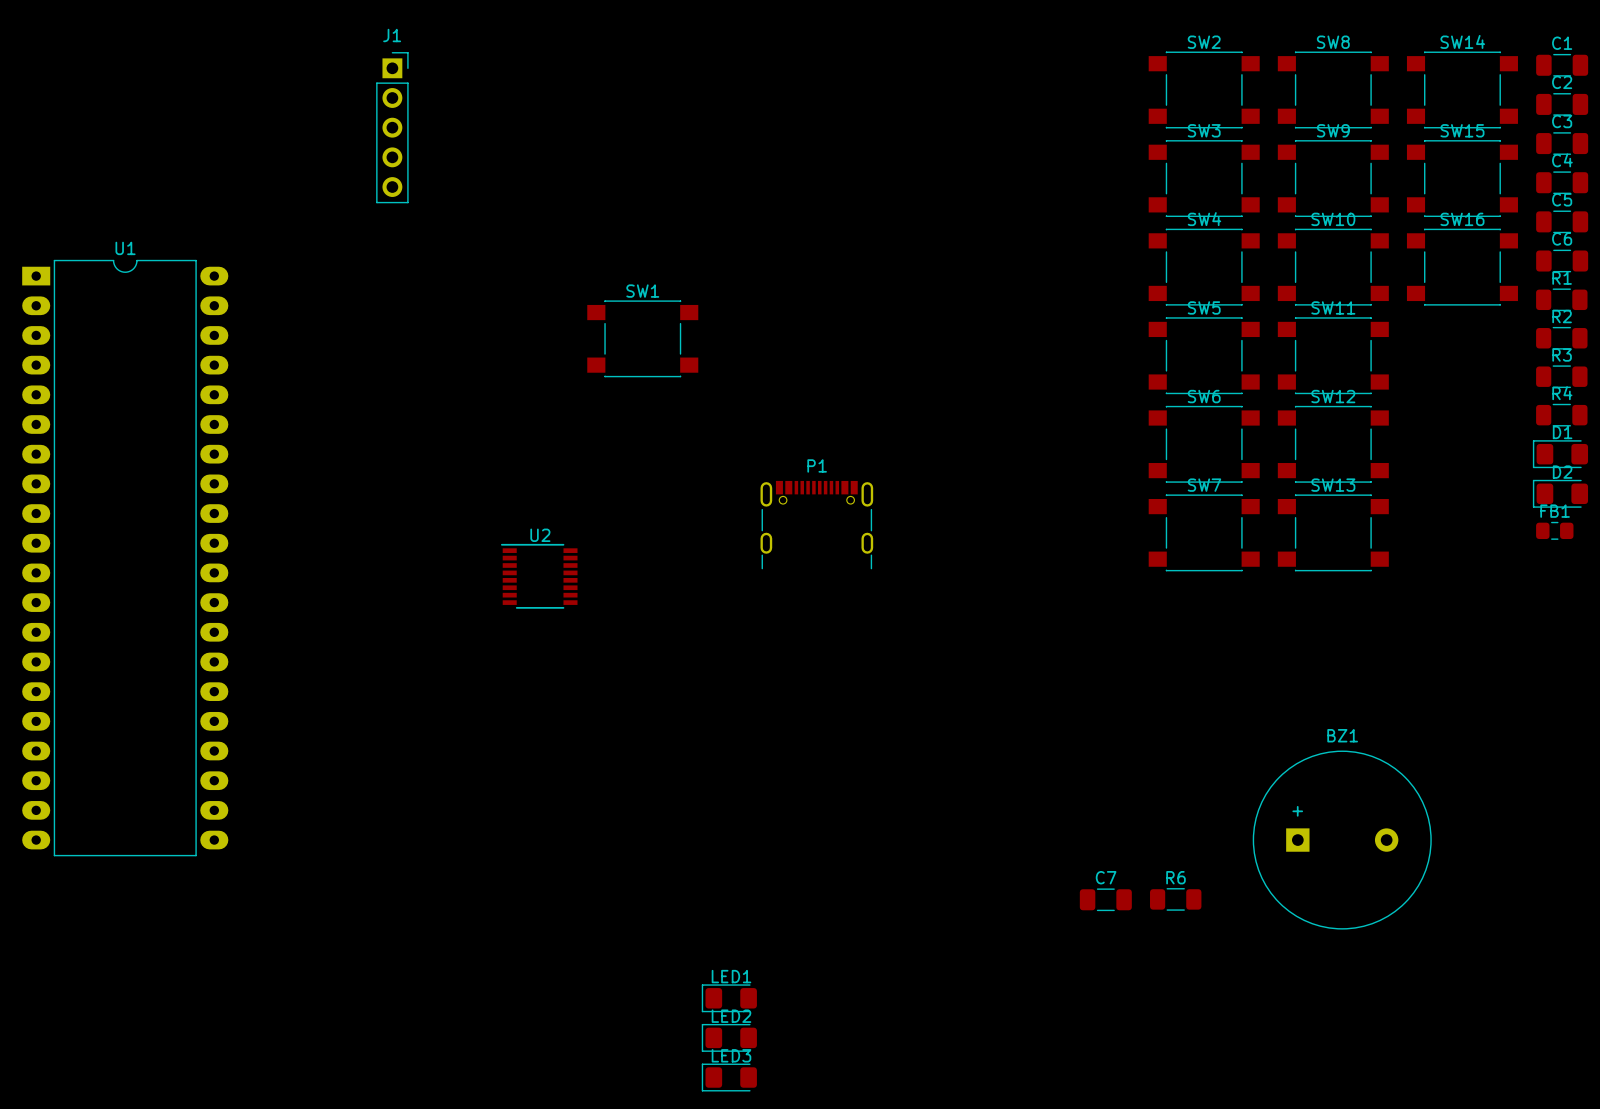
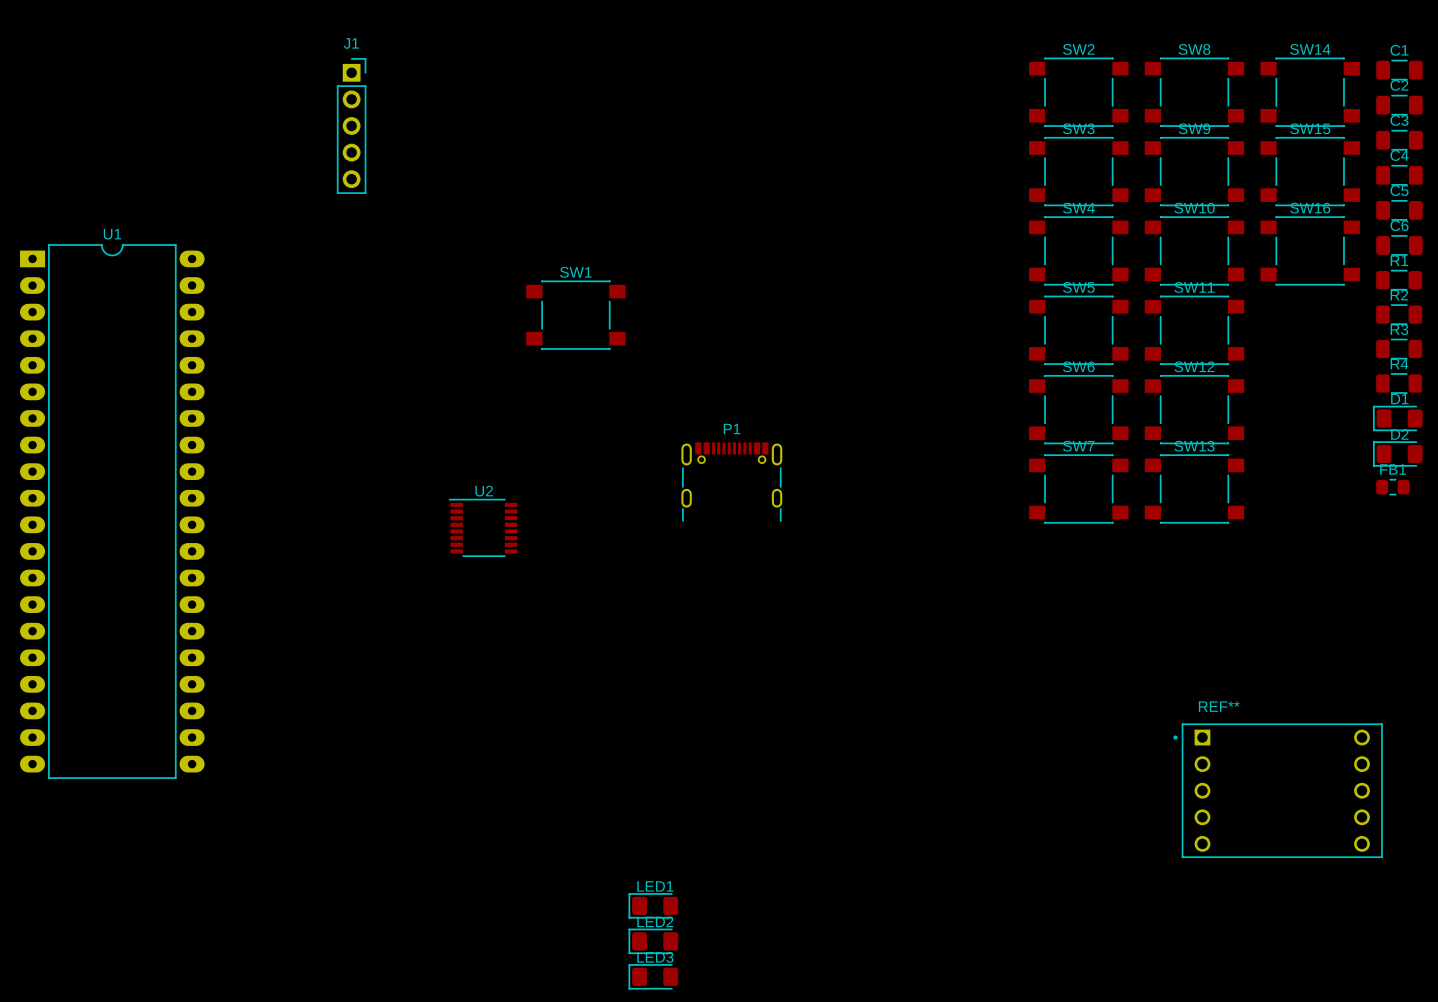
BZ1: (1342, 840) -> none
REF**: none -> (1277, 790)
C7: (1105, 899) -> none
R6: (1175, 899) -> none

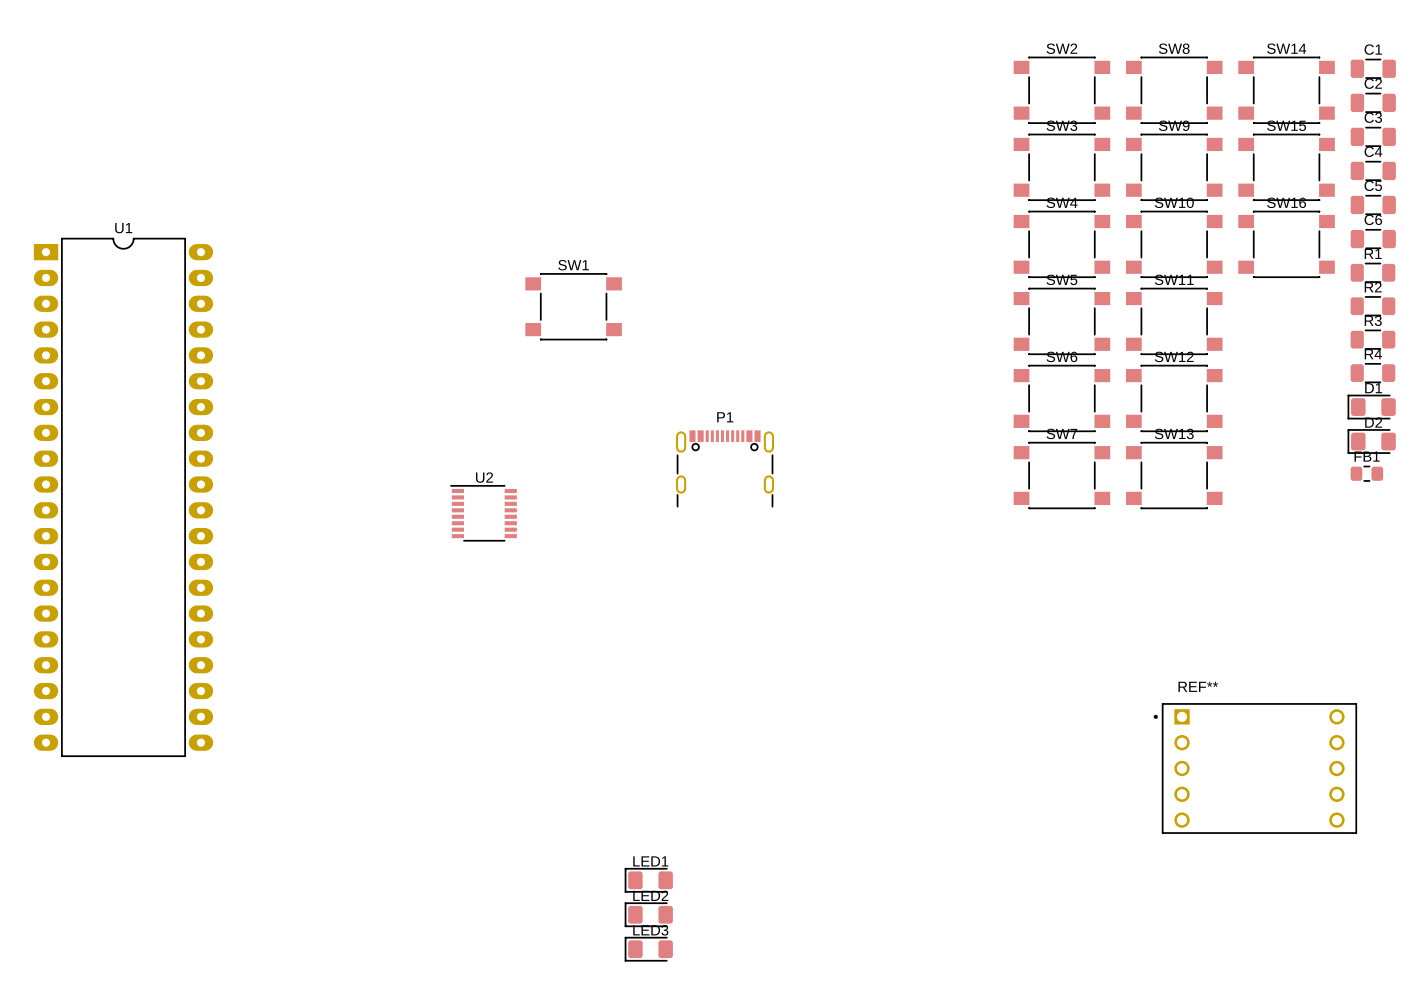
J1: (351, 125) -> none

